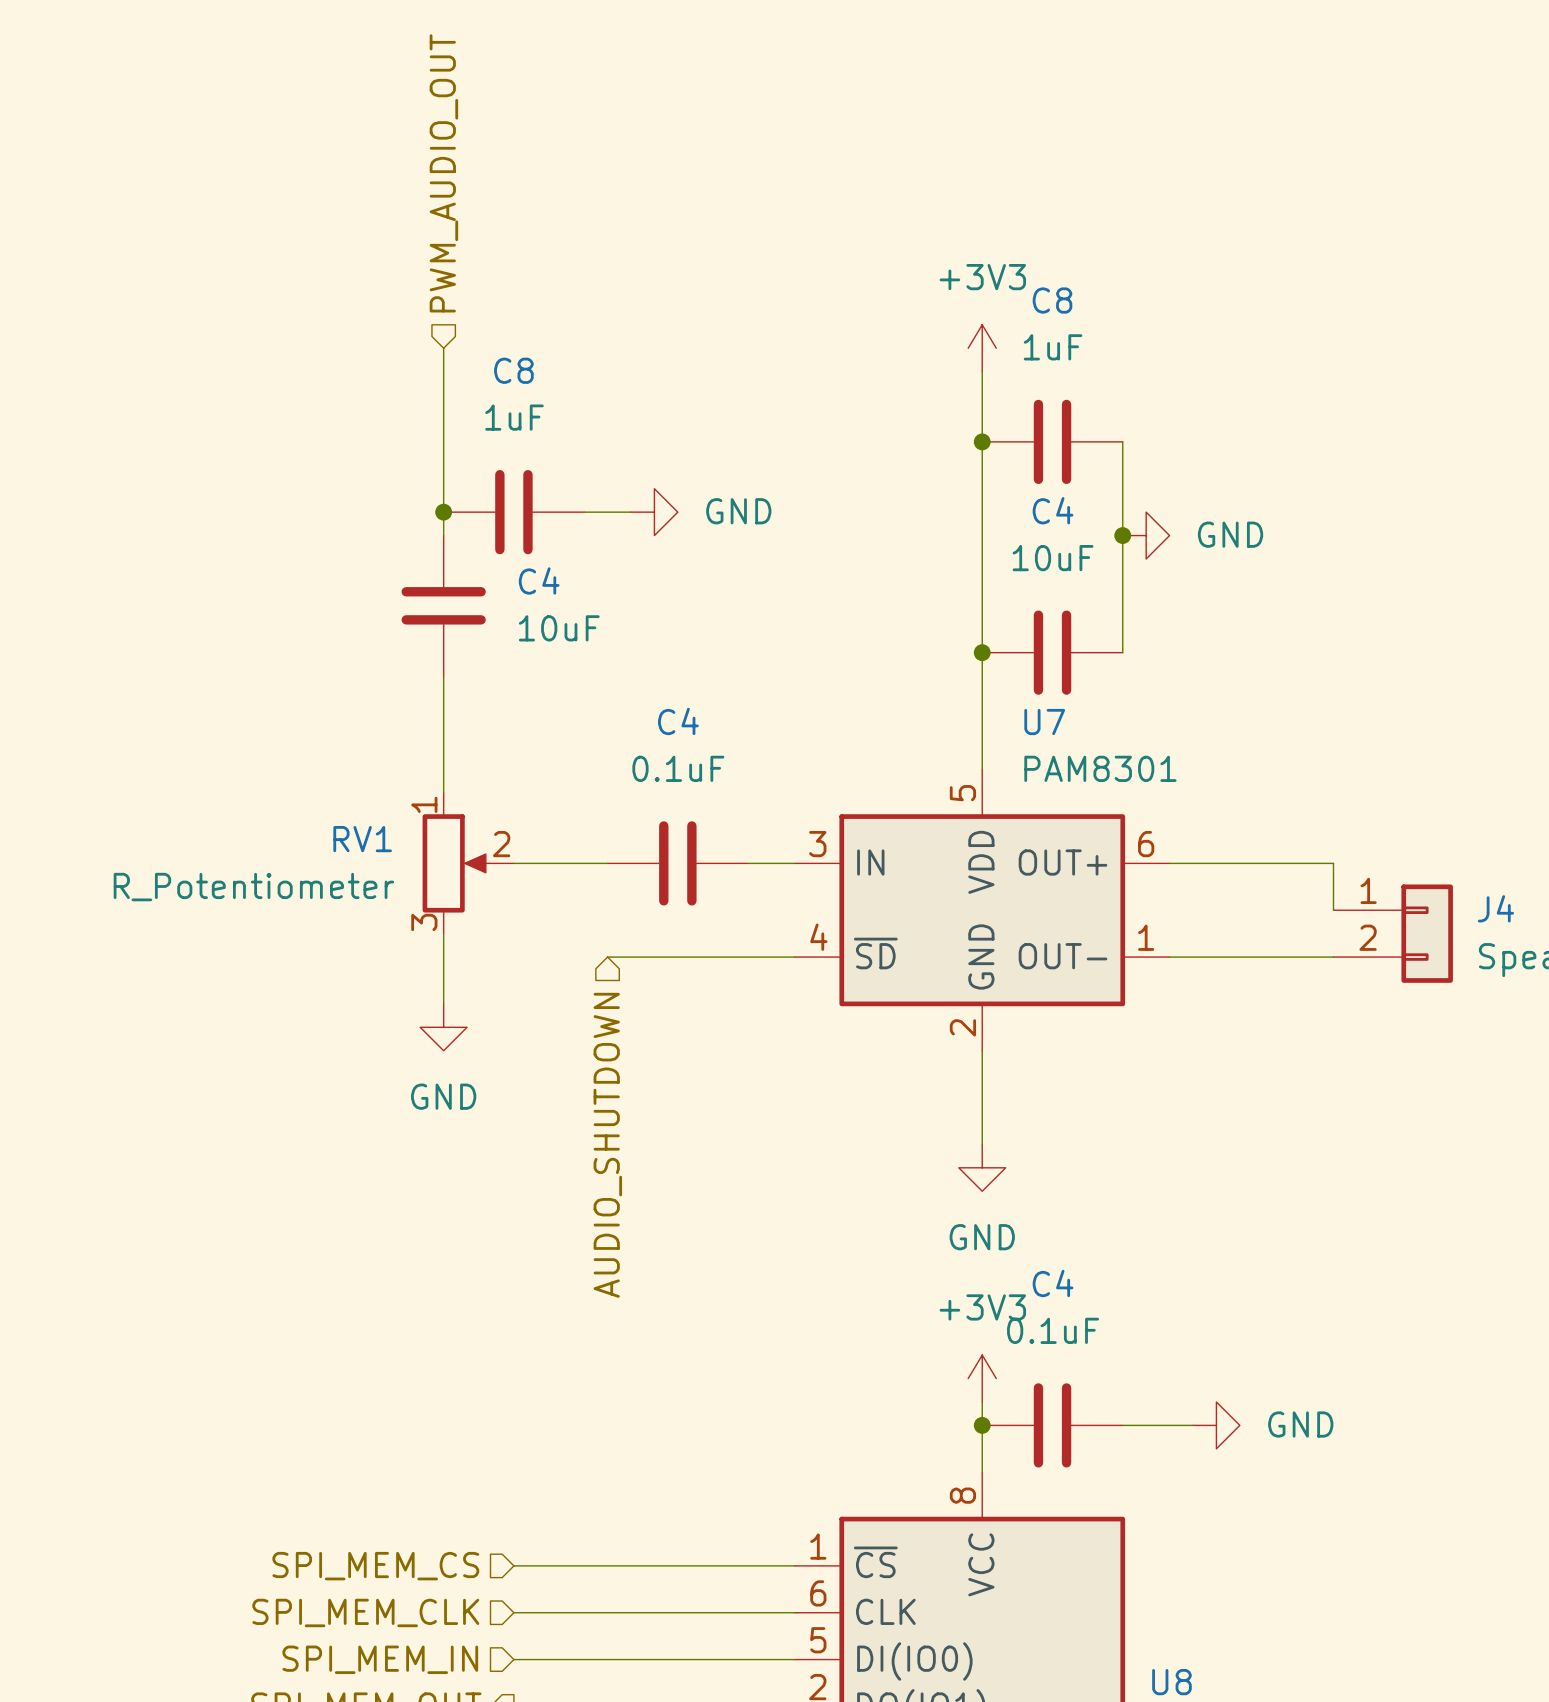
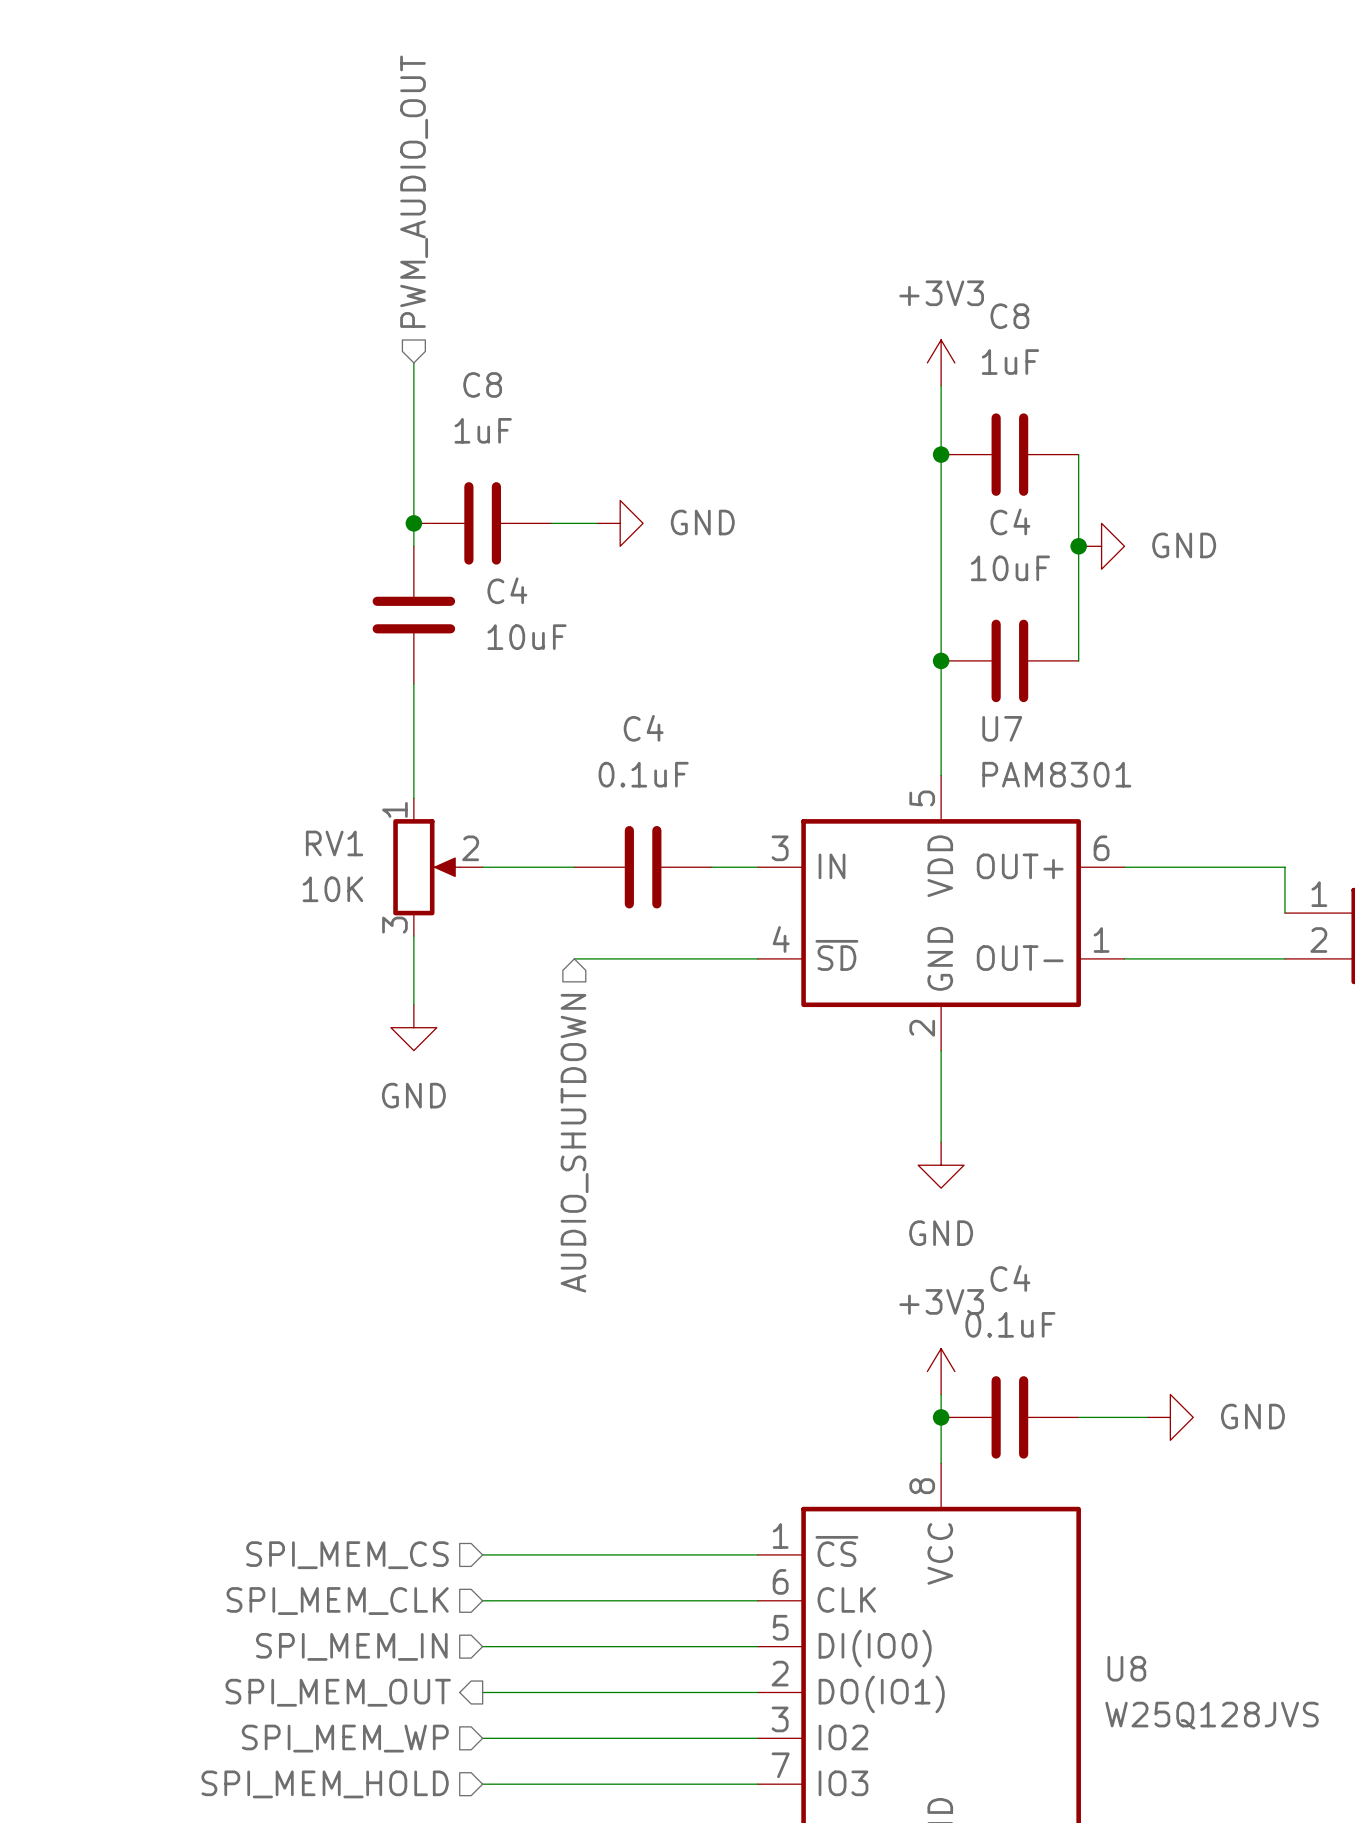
RV1 value: R_Potentiometer (253, 887) -> 10K (332, 889)

